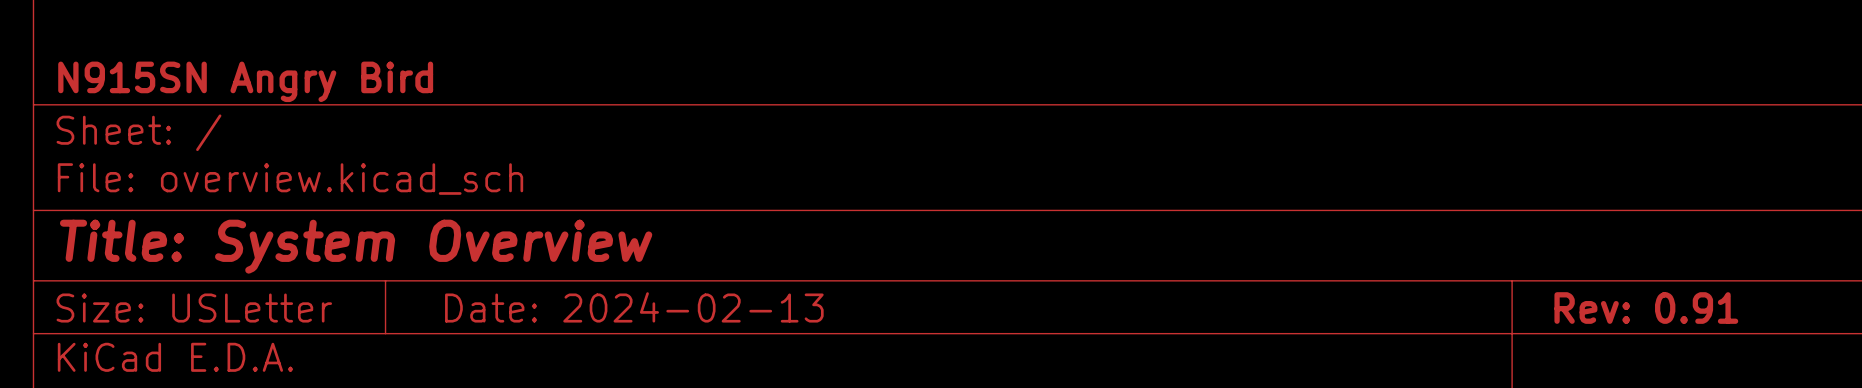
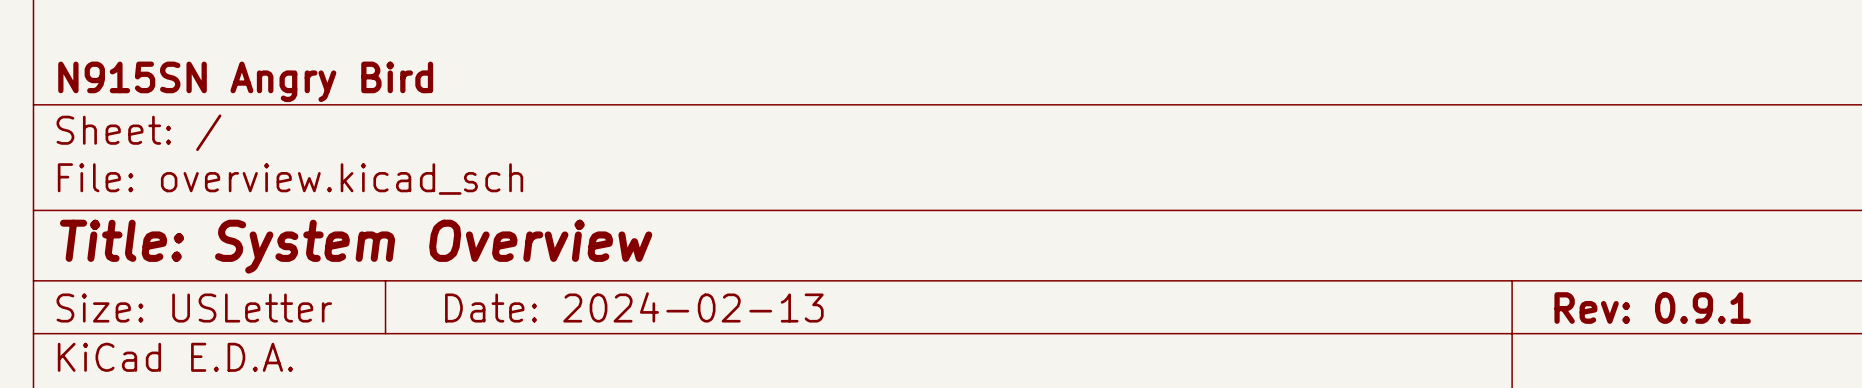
title block: Rev: 0.91 (1646, 308) -> Rev: 0.9.1 (1652, 308)

